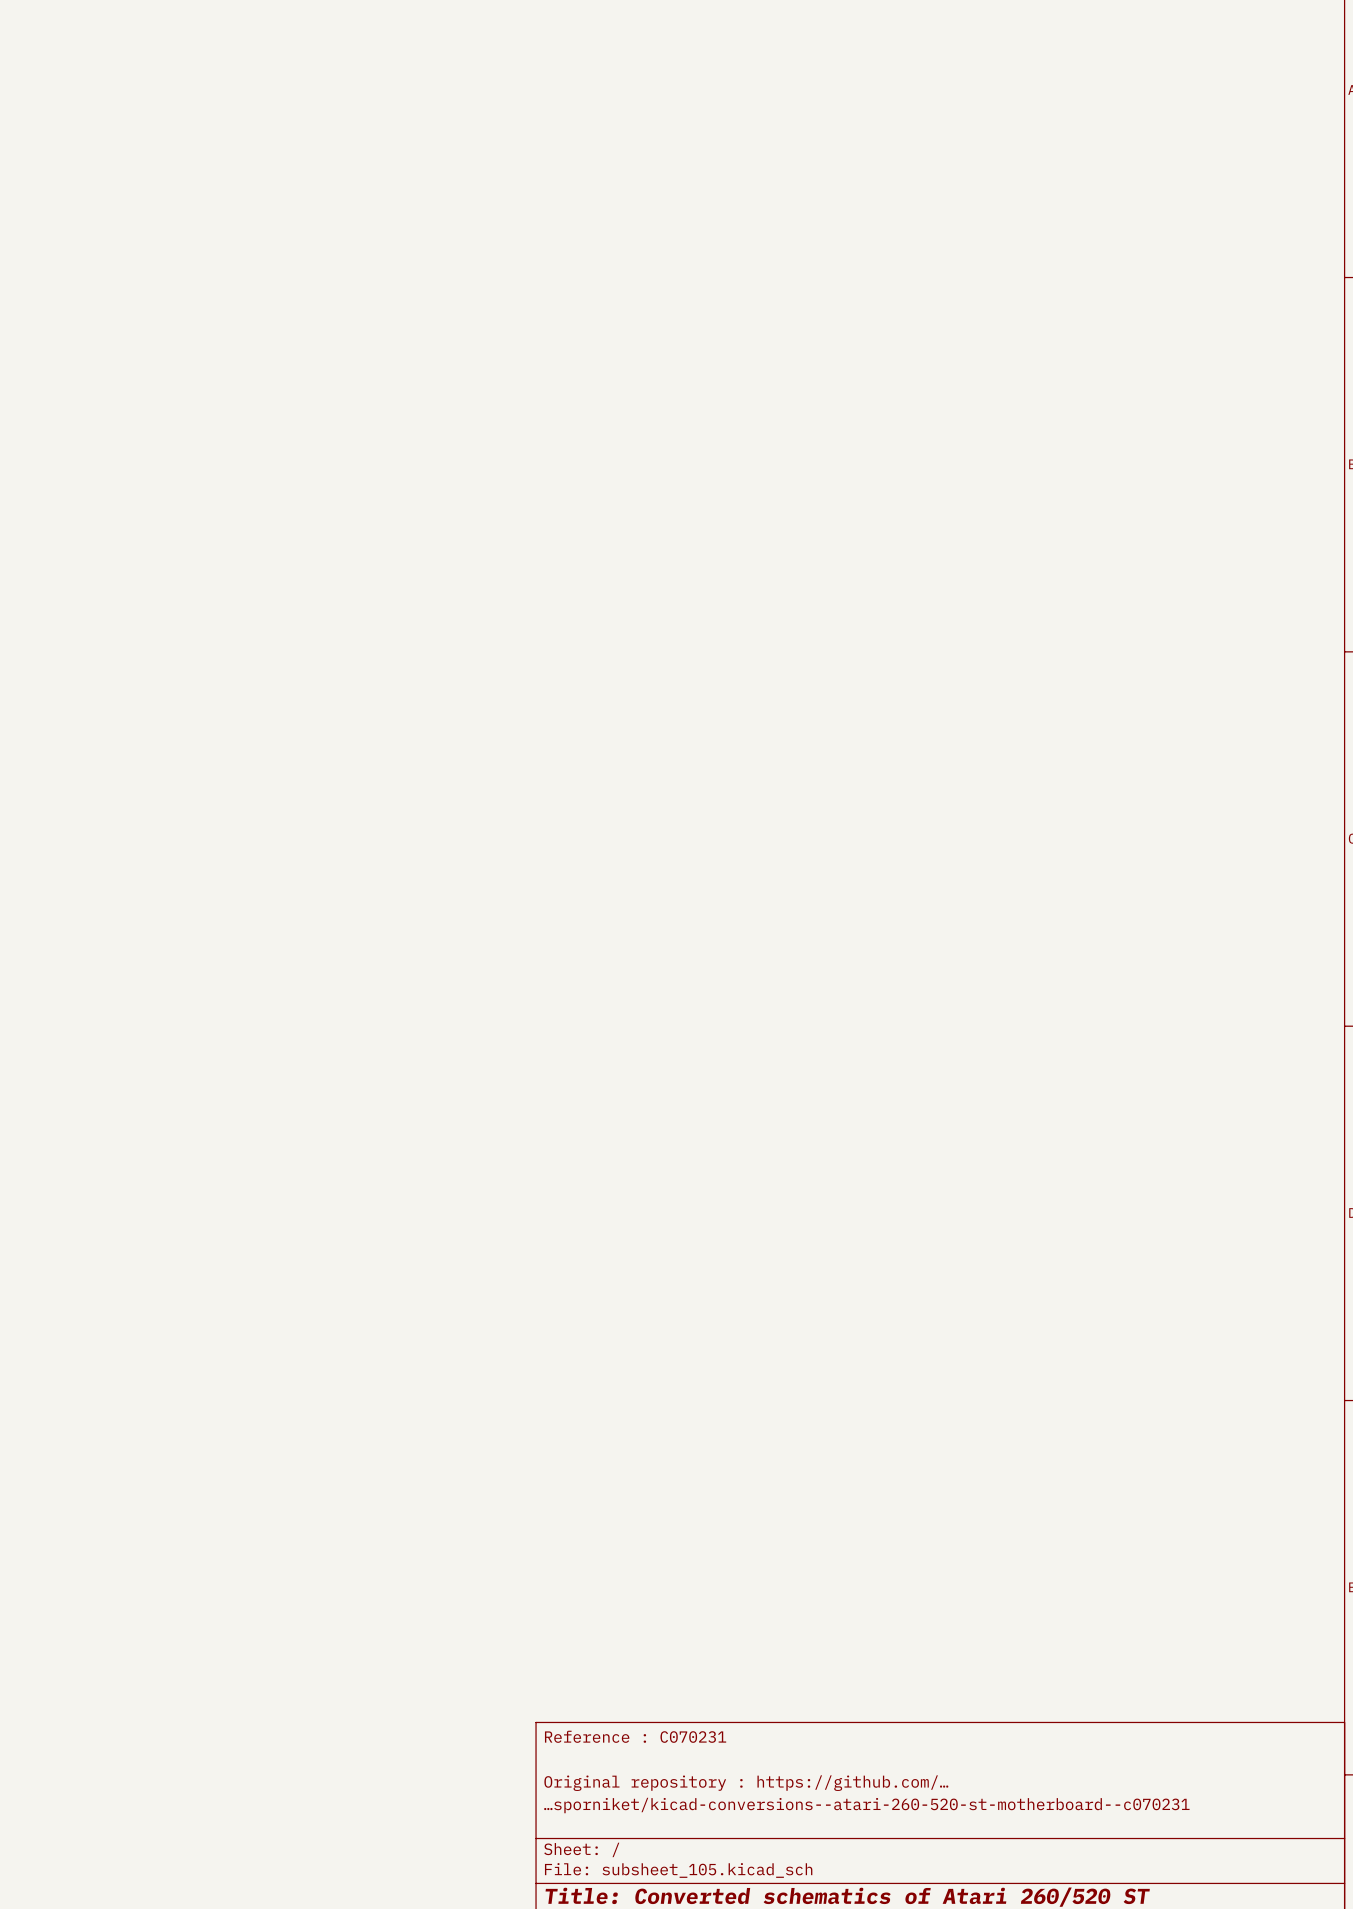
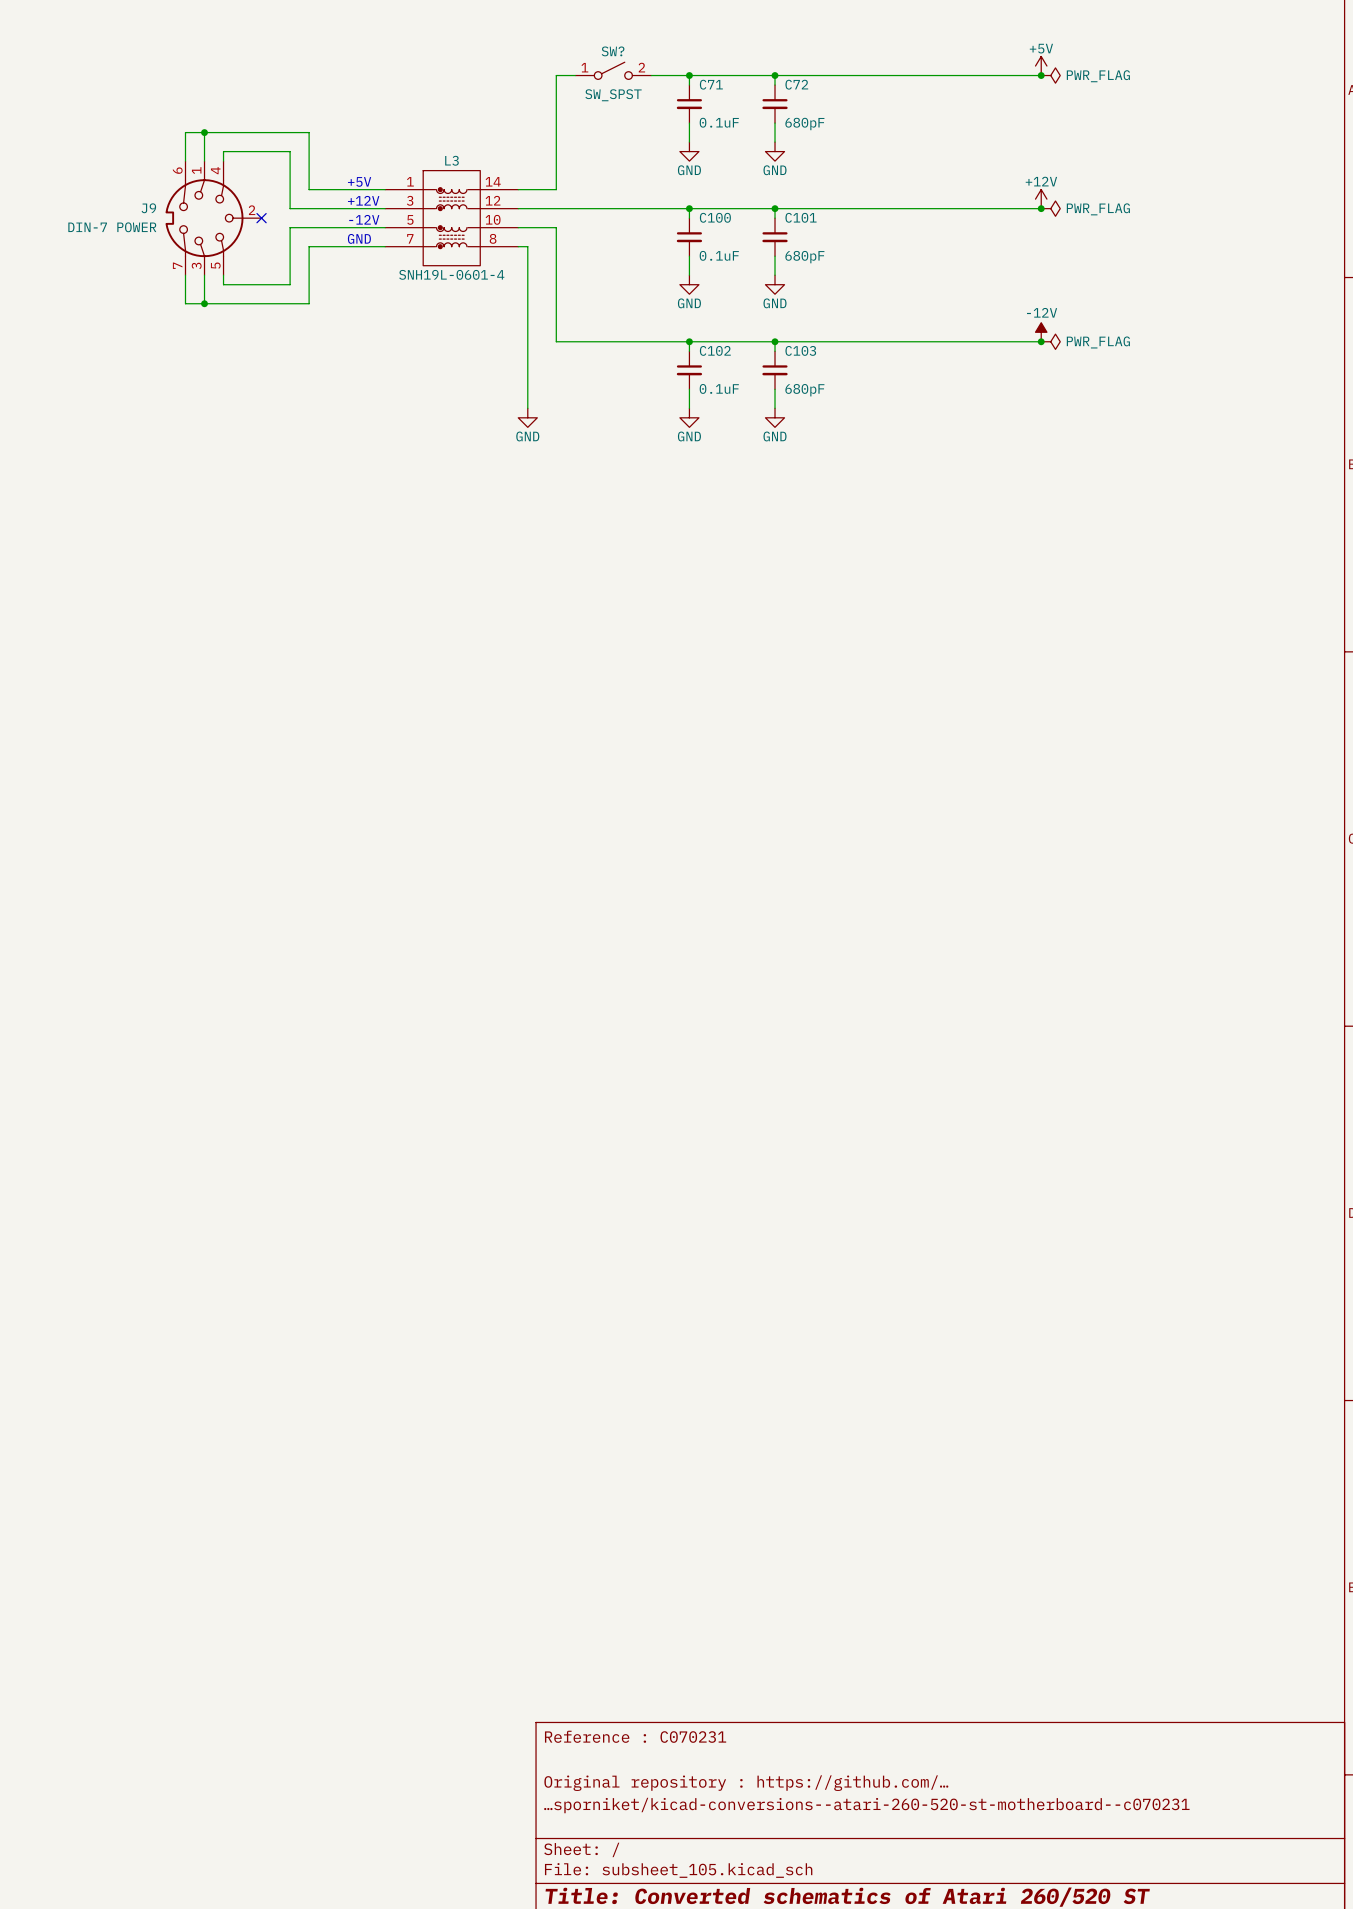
power symbol: none -> +5V (1041, 66)
SW?: none -> SW_SPST (613, 70)
wire: none -> (575, 75) (556, 75) (556, 189) (518, 189)
wire: none -> (651, 75) (1041, 75)
wire: none -> (689, 75) (689, 85)
junction: none -> (689, 75)
wire: none -> (775, 75) (775, 85)
junction: none -> (775, 75)
junction: none -> (1041, 75)
power symbol: none -> PWR_FLAG (1050, 75)
C71: none -> 0.1uF (689, 104)
C72: none -> 680pF (775, 104)
wire: none -> (689, 123) (689, 142)
wire: none -> (775, 123) (775, 142)
wire: none -> (204, 132) (204, 161)
junction: none -> (204, 132)
power symbol: none -> GND (689, 151)
power symbol: none -> GND (775, 151)
wire: none -> (185, 161) (185, 132) (309, 132) (309, 189) (385, 189)
wire: none -> (223, 161) (223, 151) (290, 151) (290, 208) (385, 208)
text: none -> +5V (359, 181)
power symbol: none -> +12V (1041, 199)
text: none -> +12V (363, 200)
wire: none -> (518, 208) (1041, 208)
wire: none -> (689, 208) (689, 218)
junction: none -> (689, 208)
wire: none -> (775, 208) (775, 218)
junction: none -> (775, 208)
junction: none -> (1041, 208)
power symbol: none -> PWR_FLAG (1050, 208)
J9: none -> DIN-7 POWER (213, 218)
no-connect mark: none -> (261, 218)
L3: none -> SNH19L-0601-4 (451, 218)
text: none -> -12V (364, 219)
wire: none -> (385, 227) (290, 227) (290, 284) (223, 284) (223, 275)
wire: none -> (518, 227) (556, 227) (556, 341) (1041, 341)
C100: none -> 0.1uF (689, 237)
C101: none -> 680pF (775, 237)
text: none -> GND (359, 238)
wire: none -> (385, 246) (309, 246) (309, 303) (185, 303) (185, 275)
wire: none -> (518, 246) (527, 246) (527, 408)
wire: none -> (689, 256) (689, 275)
wire: none -> (775, 256) (775, 275)
wire: none -> (204, 275) (204, 303)
power symbol: none -> GND (689, 284)
power symbol: none -> GND (775, 284)
junction: none -> (204, 303)
power symbol: none -> -12V (1041, 332)
wire: none -> (689, 341) (689, 351)
junction: none -> (689, 341)
wire: none -> (775, 341) (775, 351)
junction: none -> (775, 341)
junction: none -> (1041, 341)
power symbol: none -> PWR_FLAG (1050, 341)
C102: none -> 0.1uF (689, 370)
C103: none -> 680pF (775, 370)
wire: none -> (689, 389) (689, 408)
wire: none -> (775, 389) (775, 408)
power symbol: none -> GND (527, 417)
power symbol: none -> GND (689, 417)
power symbol: none -> GND (775, 417)

